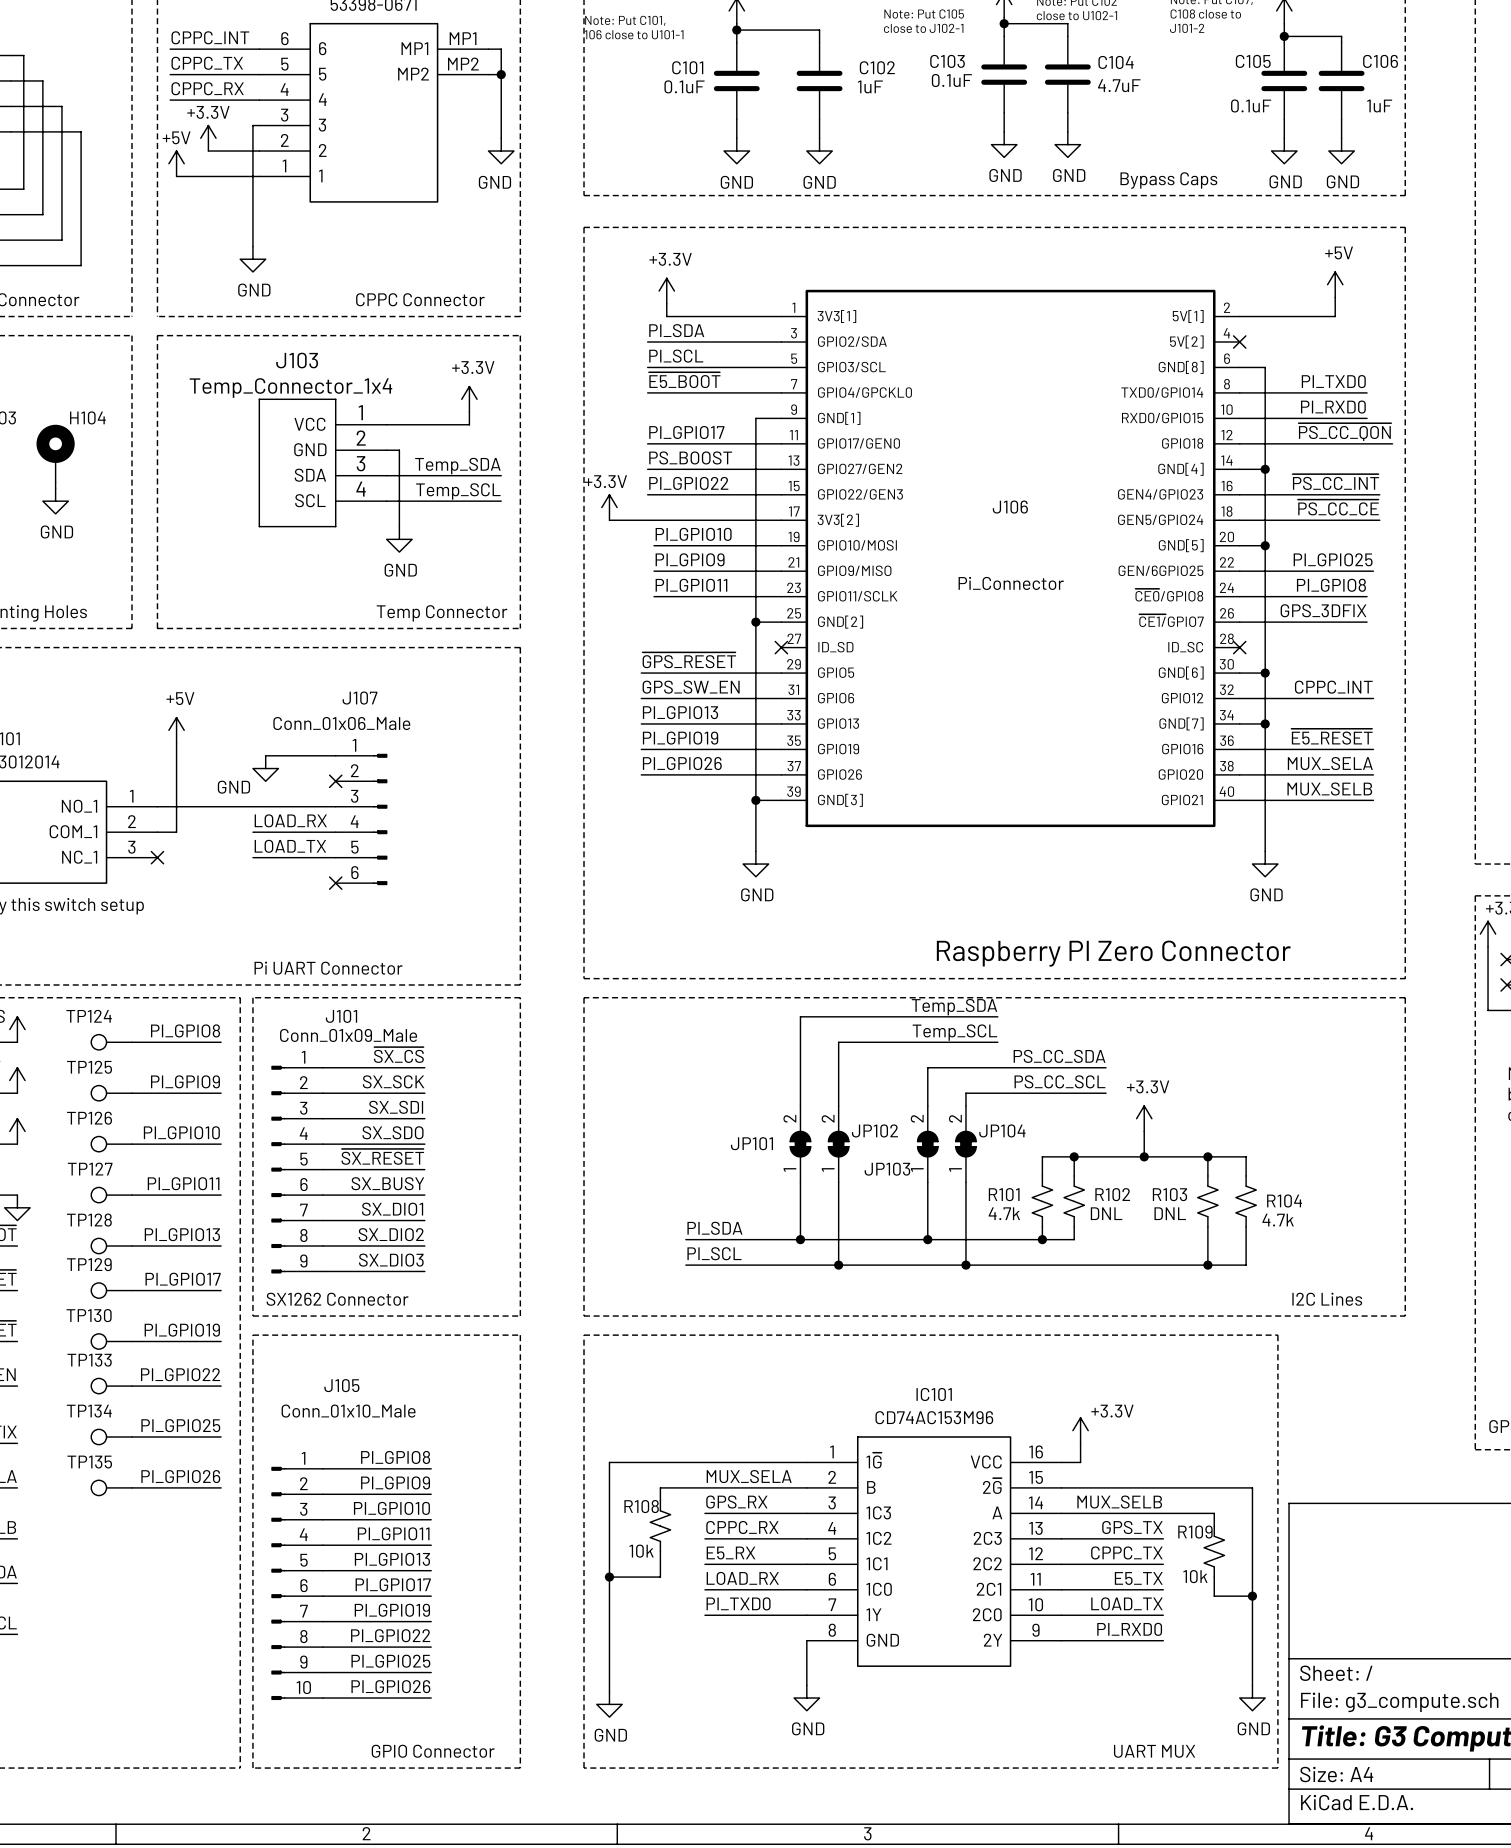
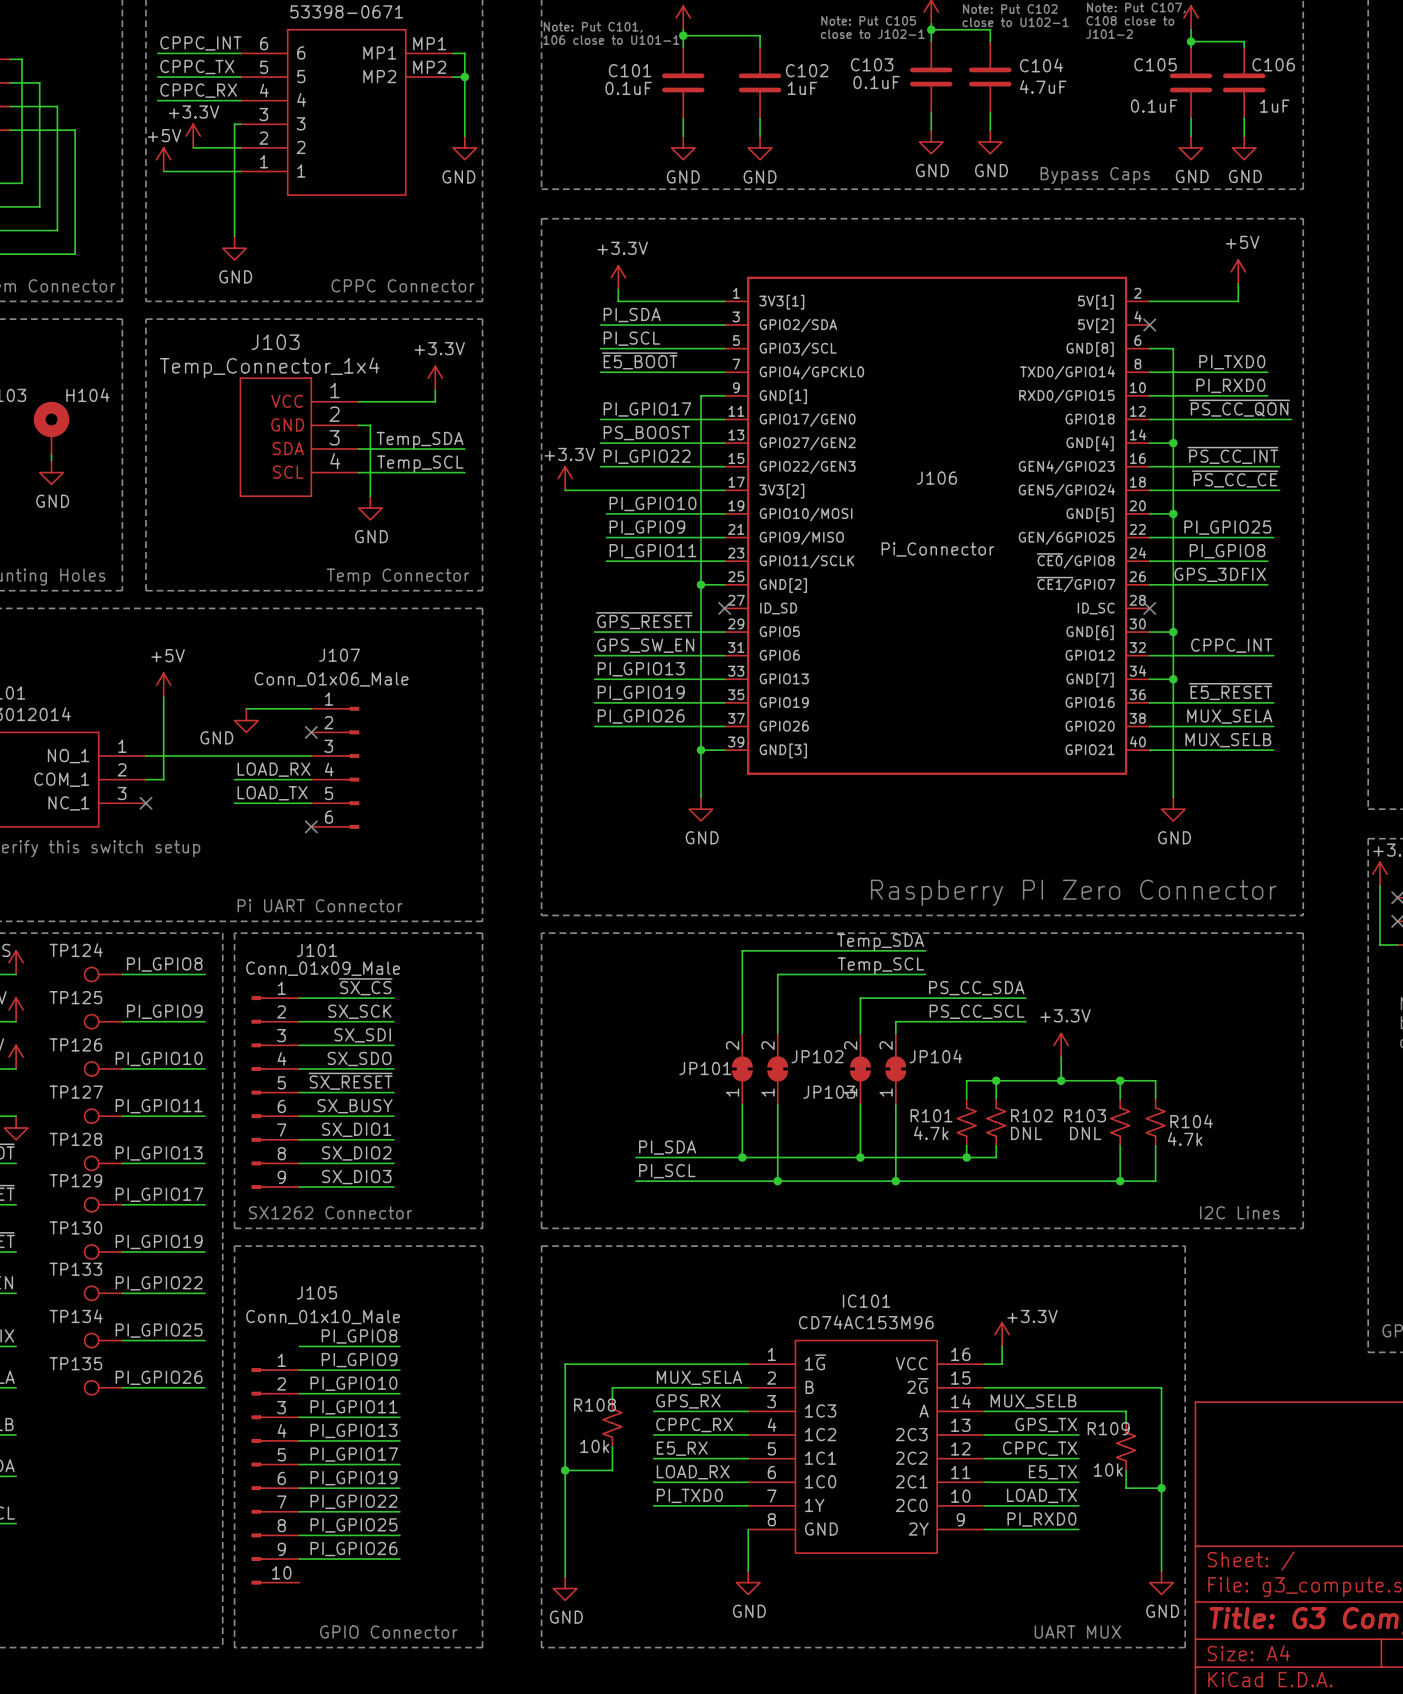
label: none -> PI_GPIO8 (359, 1336)
wire: none -> (299, 1346) (399, 1346)
label: PI_GPIO8 (395, 1457) -> PI_GPIO9 (359, 1360)
label: PI_GPIO9 (395, 1482) -> PI_GPIO10 (353, 1383)
label: PI_GPIO10 (391, 1508) -> PI_GPIO11 (353, 1407)
label: PI_GPIO11 (393, 1533) -> PI_GPIO13 (353, 1430)
label: PI_GPIO13 (392, 1559) -> PI_GPIO17 (354, 1454)
label: PI_GPIO17 (393, 1584) -> PI_GPIO19 (353, 1478)
label: PI_GPIO19 (392, 1610) -> PI_GPIO22 (353, 1501)
label: PI_GPIO22 (390, 1635) -> PI_GPIO25 (353, 1525)
label: PI_GPIO25 (390, 1661) -> PI_GPIO26 (353, 1549)
label: PI_GPIO26 (390, 1686) -> none
wire: (322, 1698) (431, 1698) -> none

